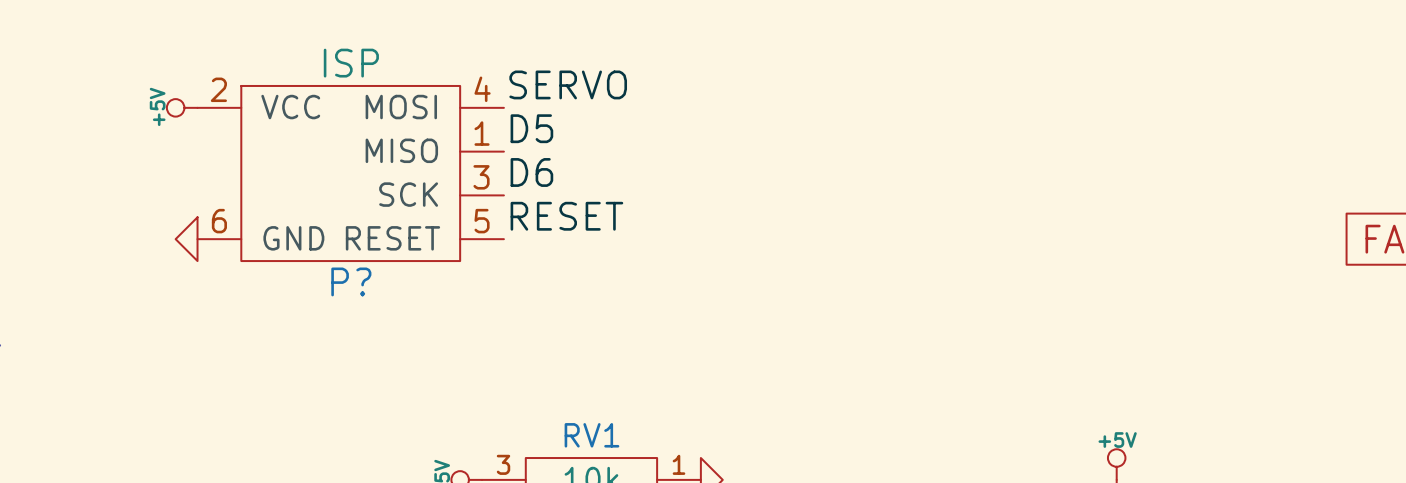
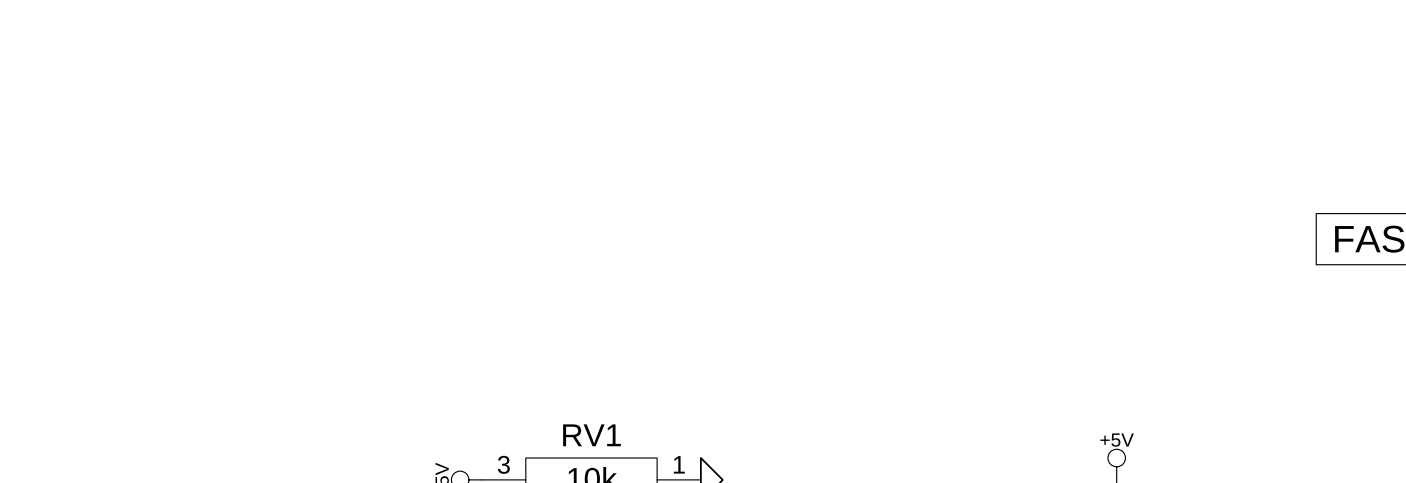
label: SERVO (568, 84) -> none
power symbol: +5V (182, 107) -> none
label: D5 (531, 128) -> none
label: D6 (531, 172) -> none
P?: ISP (350, 173) -> none
label: RESET (566, 216) -> none
power symbol: (186, 239) -> none

